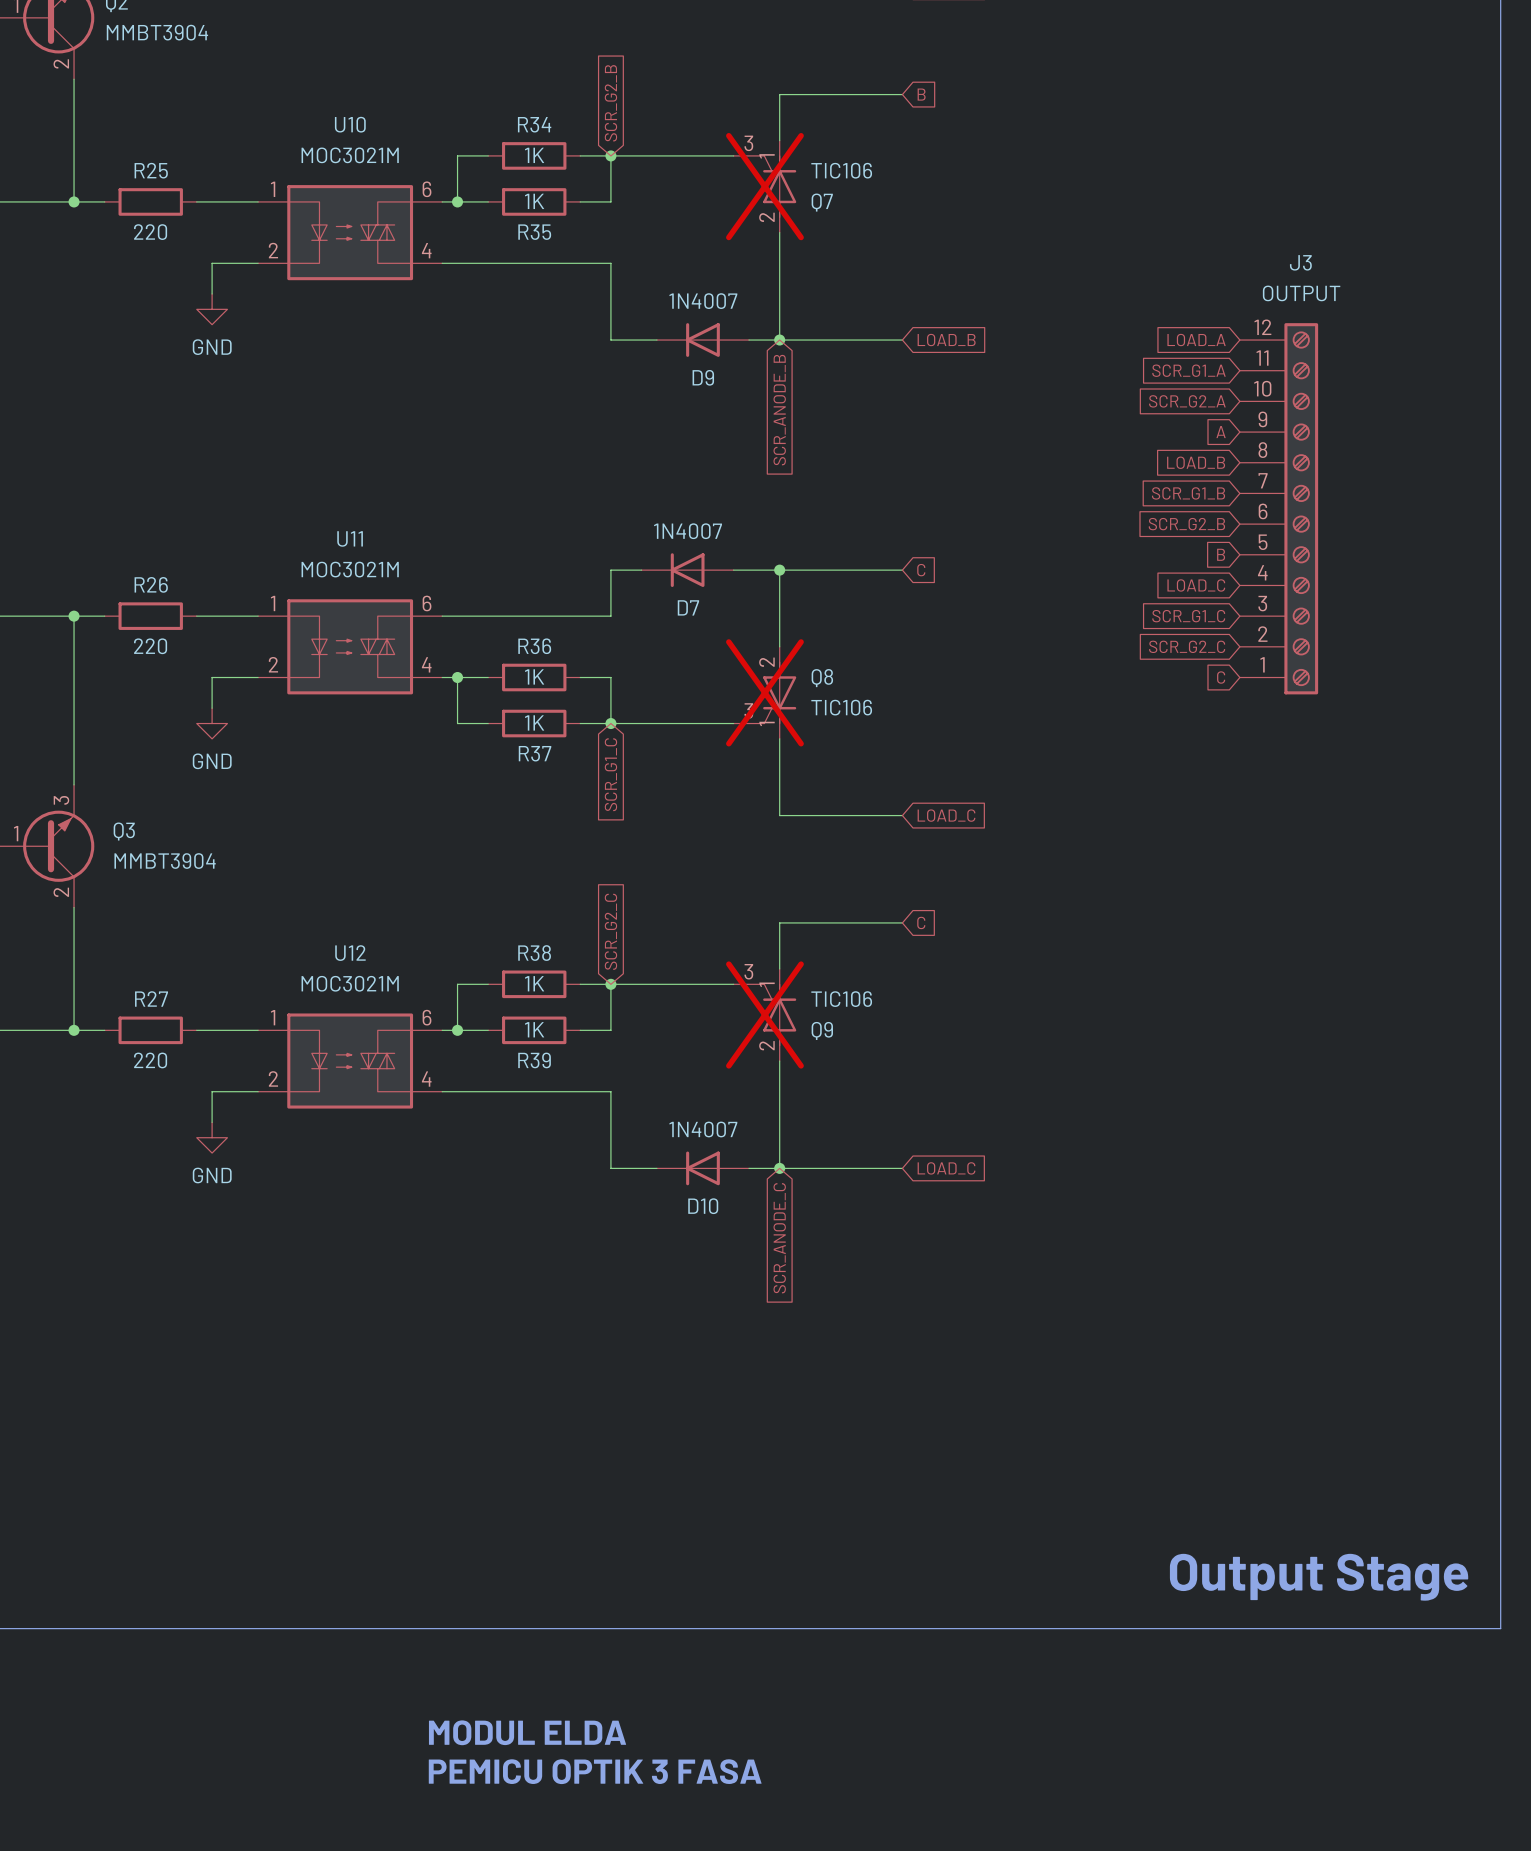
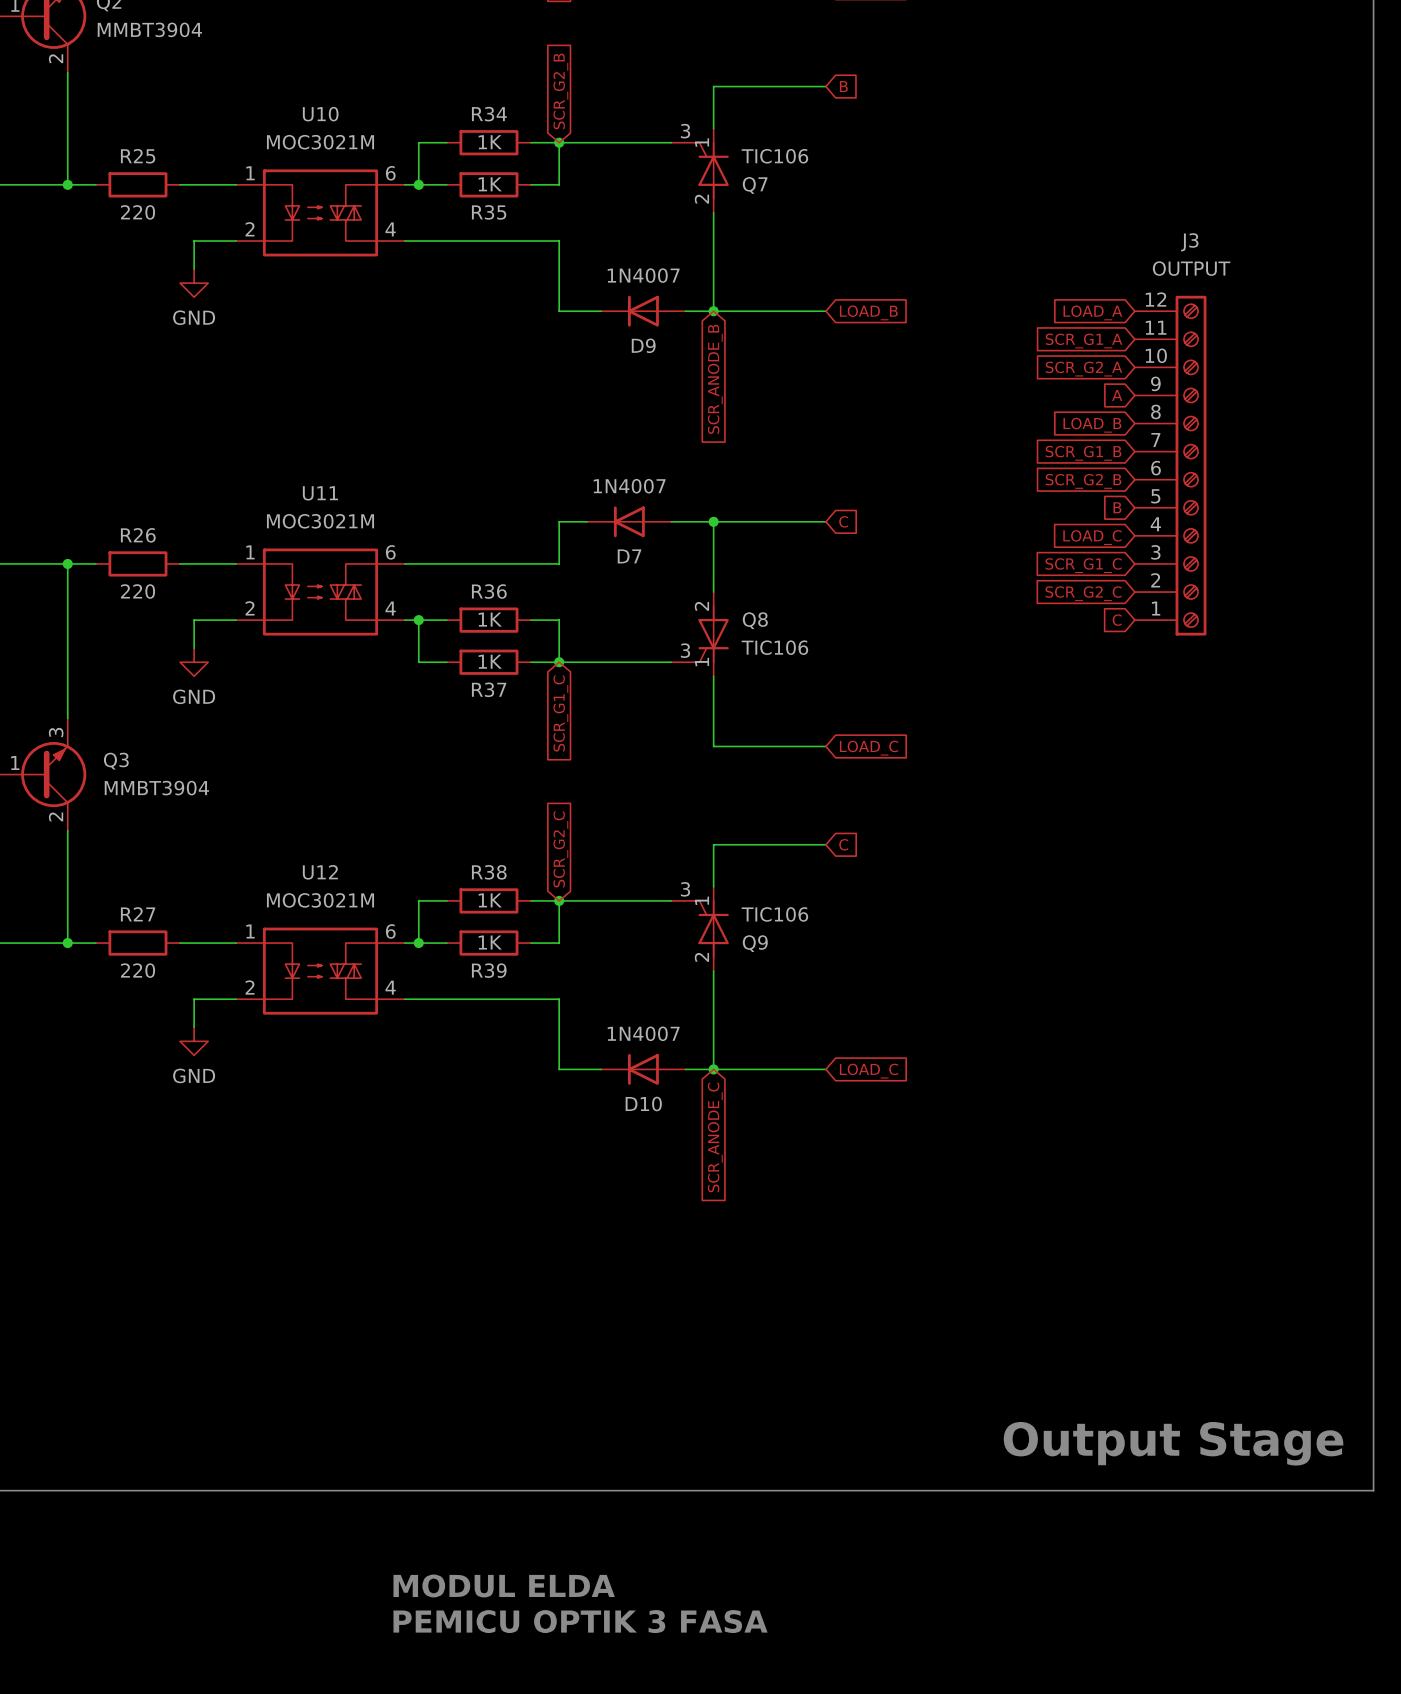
Q7 do-not-place cross: (764, 186) -> none
Q8 do-not-place cross: (764, 692) -> none
Q9 do-not-place cross: (764, 1015) -> none

